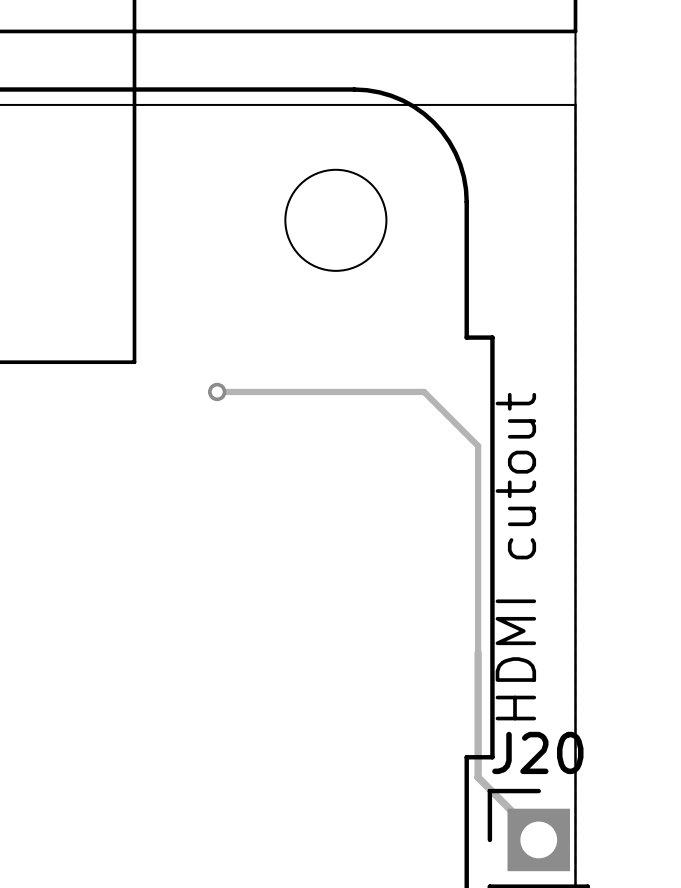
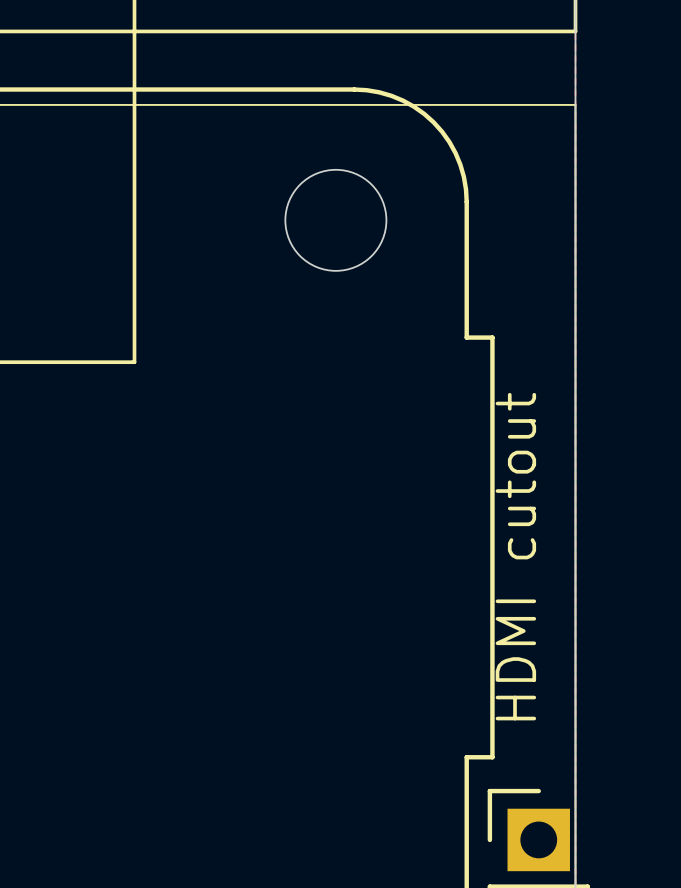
track: (217, 391) (424, 391) (478, 445) (478, 777) (538, 839) -> none
via: (217, 391) -> none
J20 name: J20 (537, 752) -> none

